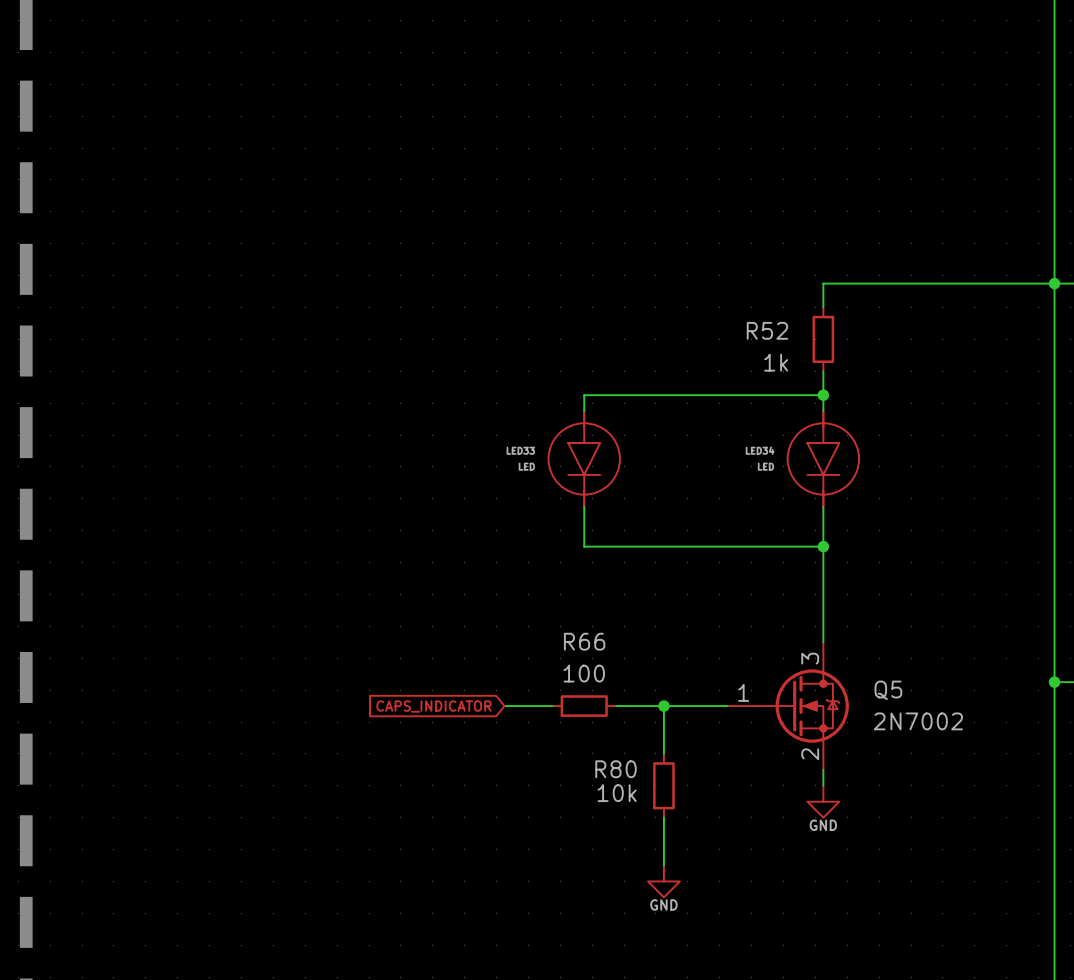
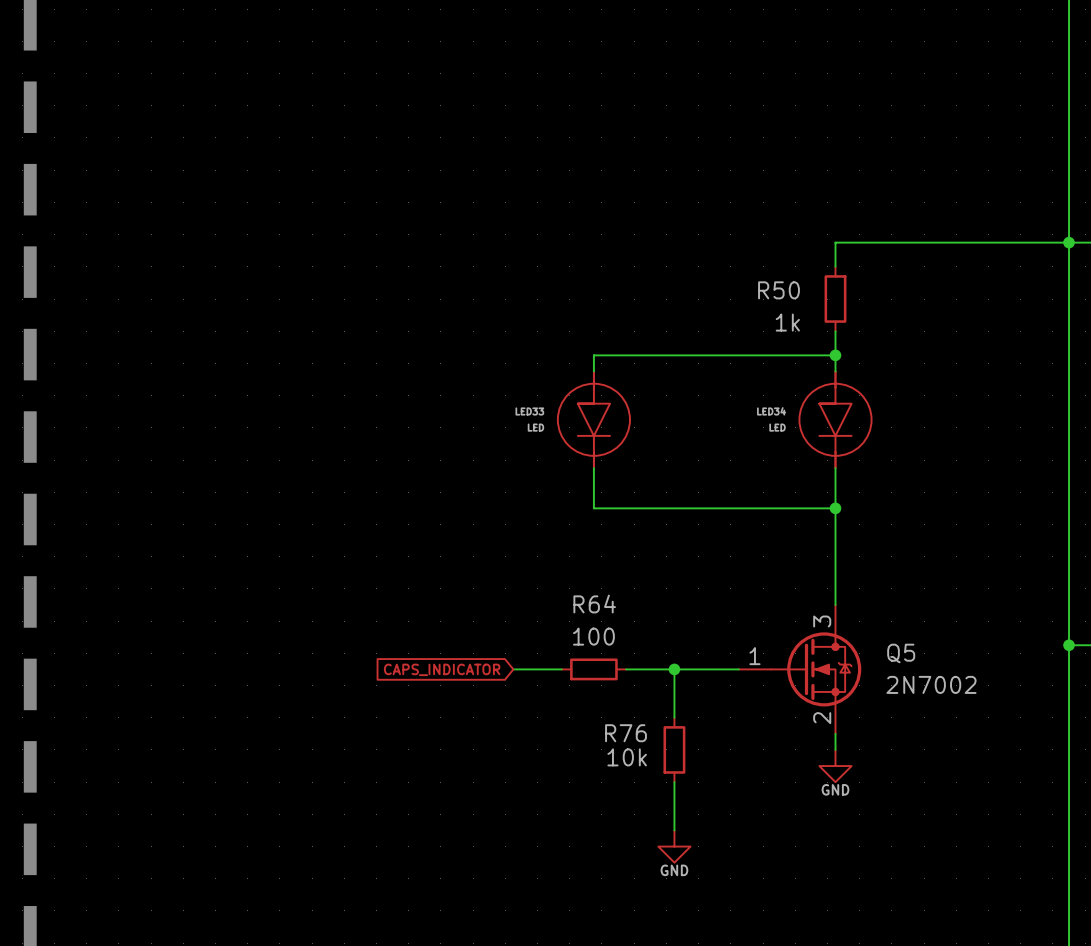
R52 name: R52 (767, 330) -> R50 (779, 290)
R66 name: R66 (584, 641) -> R64 (594, 604)
R80 name: R80 (616, 769) -> R76 (626, 733)

